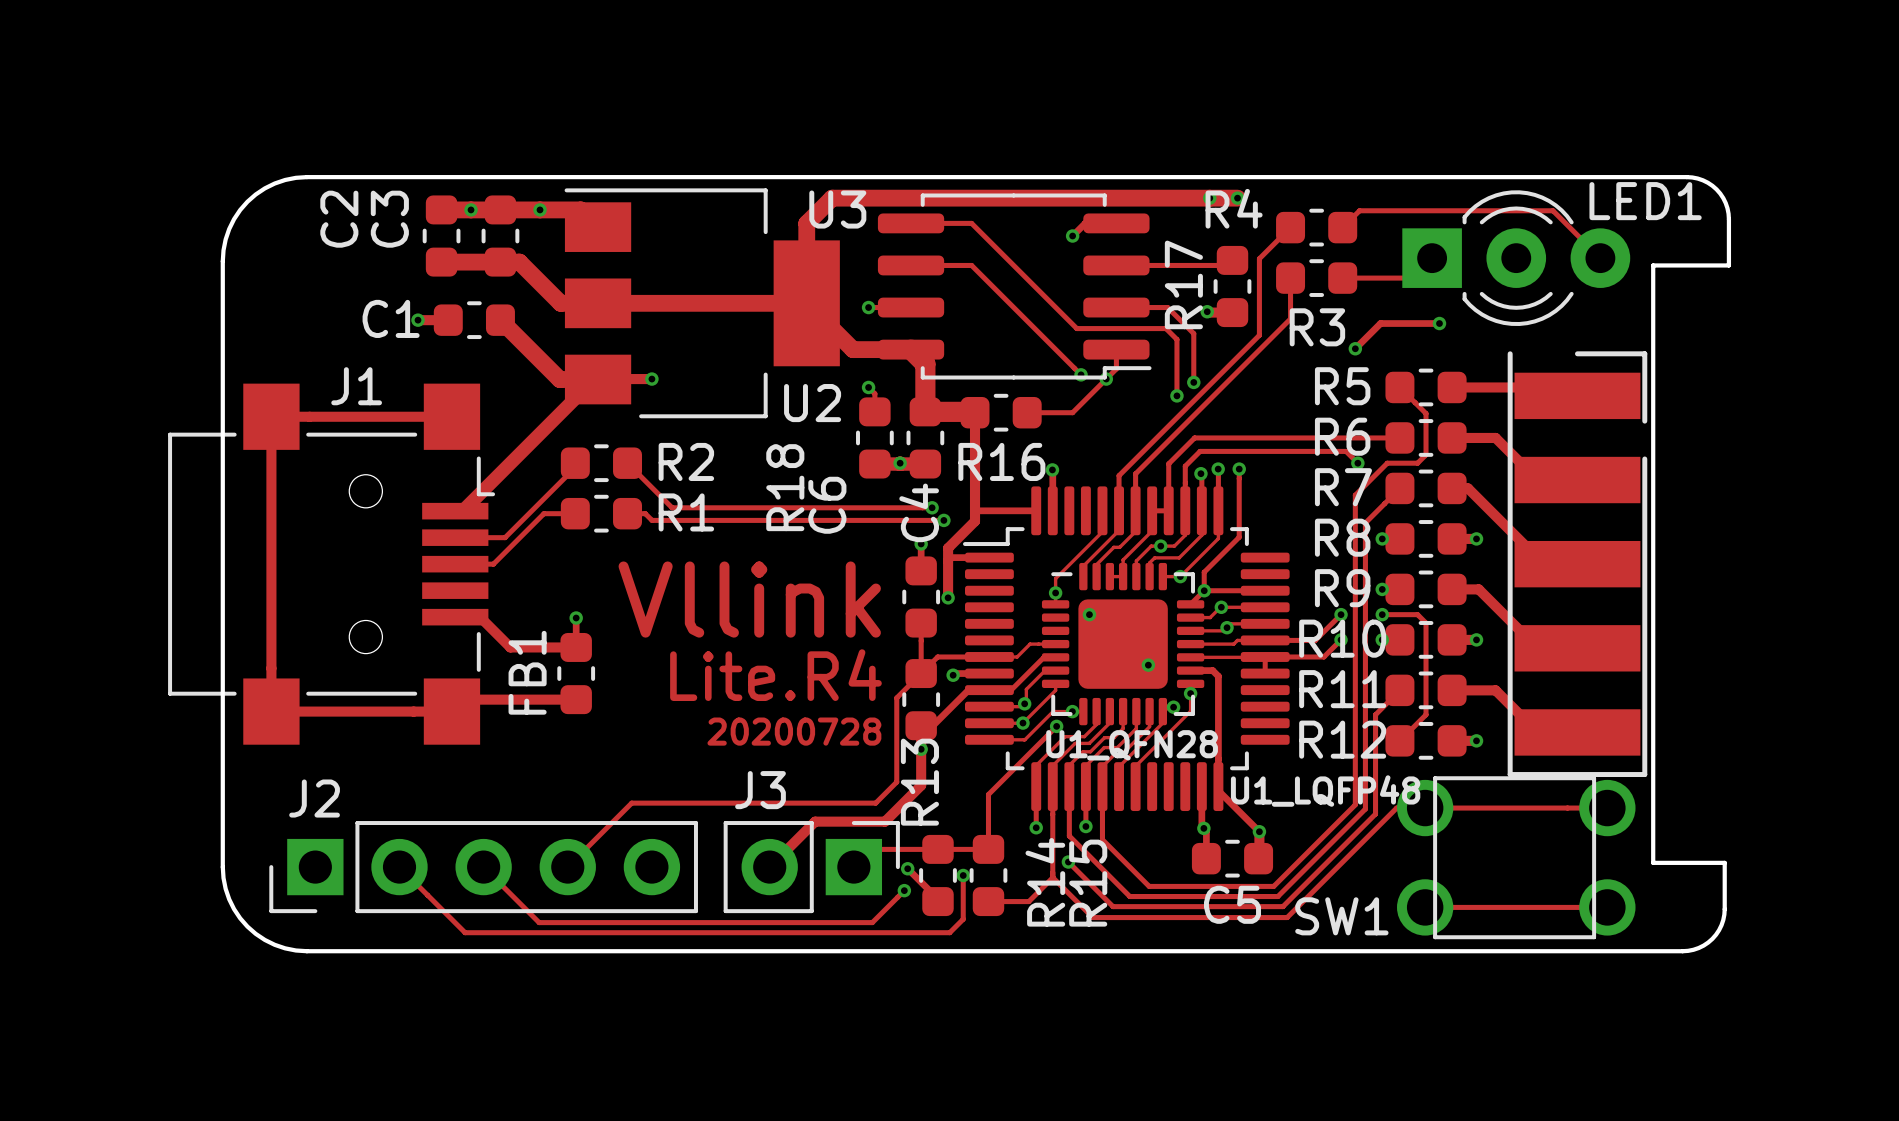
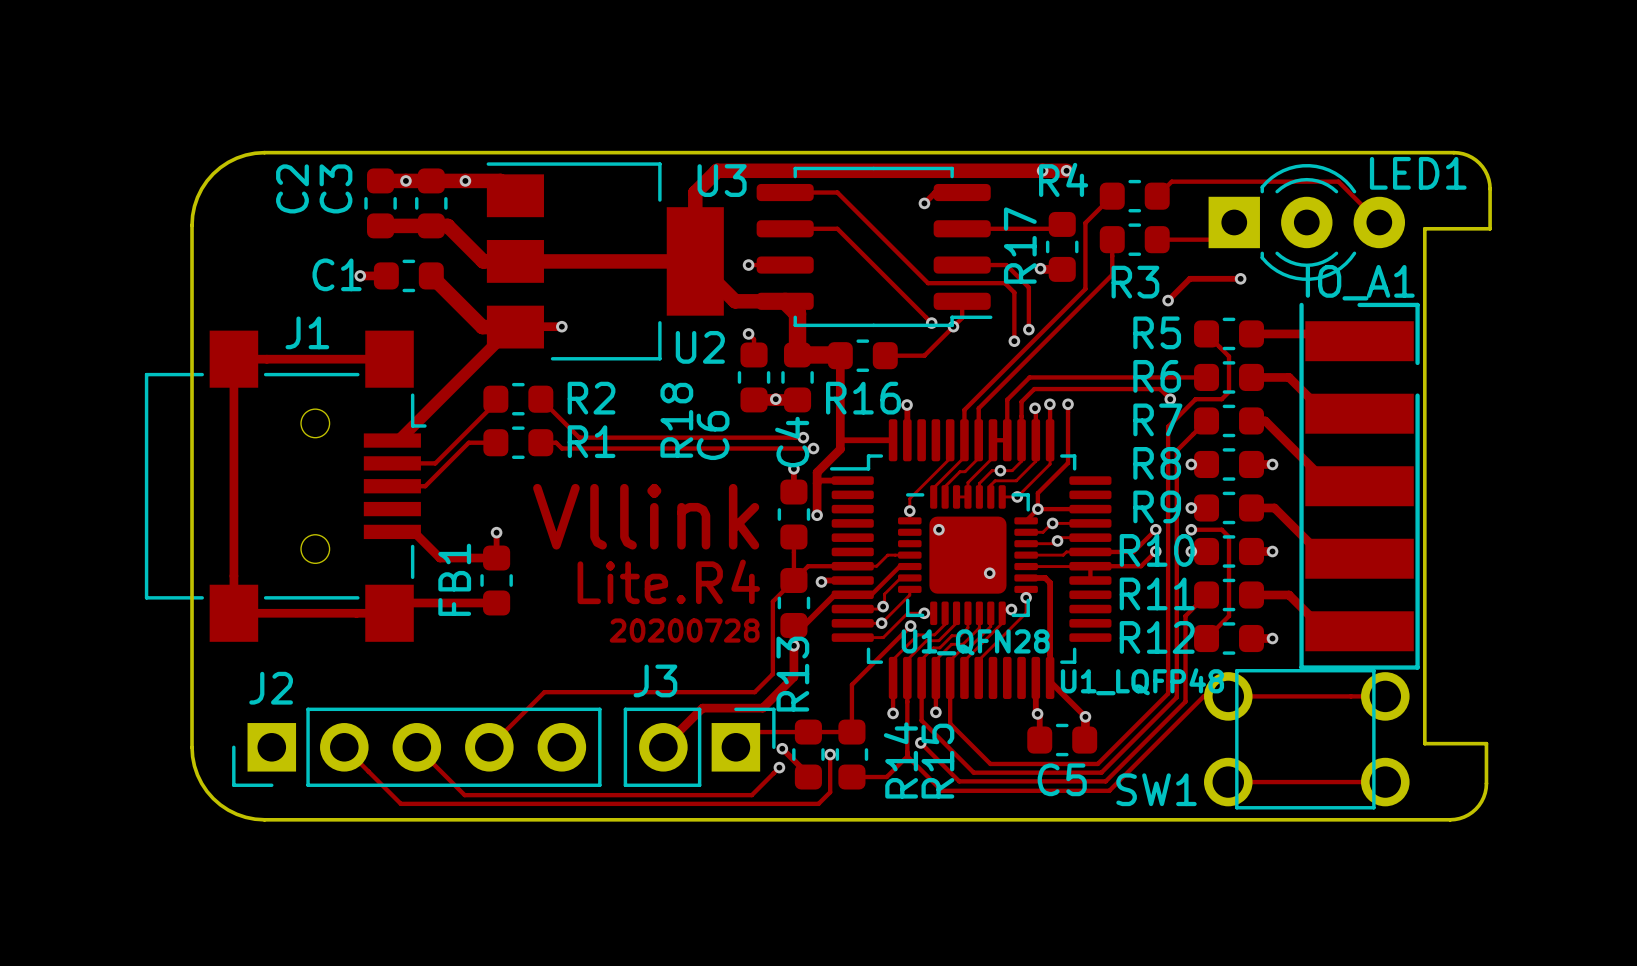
IO_A1 name: none -> IO_A1 (1360, 282)

